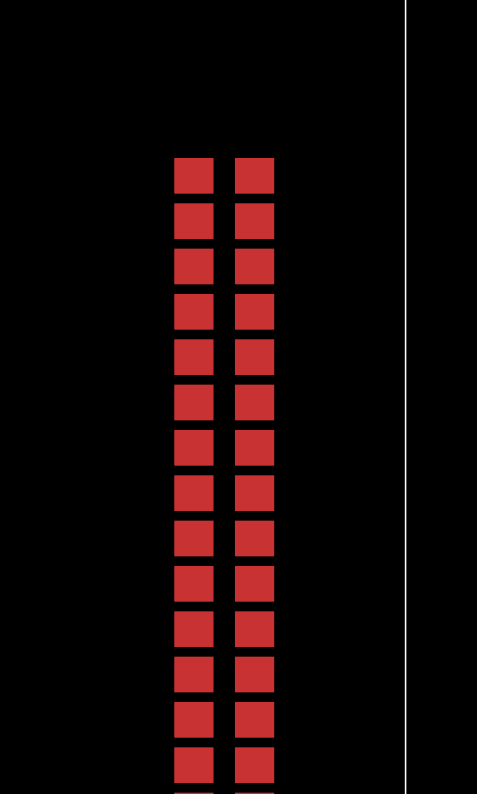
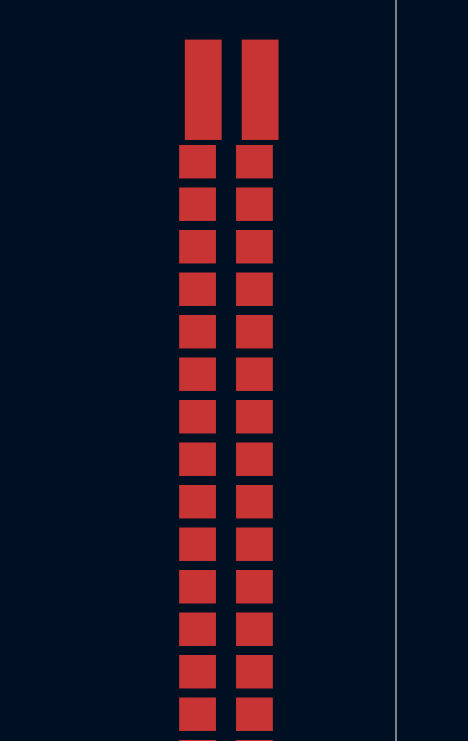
part: none -> (231, 56)
part: none -> (231, 89)
part: none -> (231, 123)

